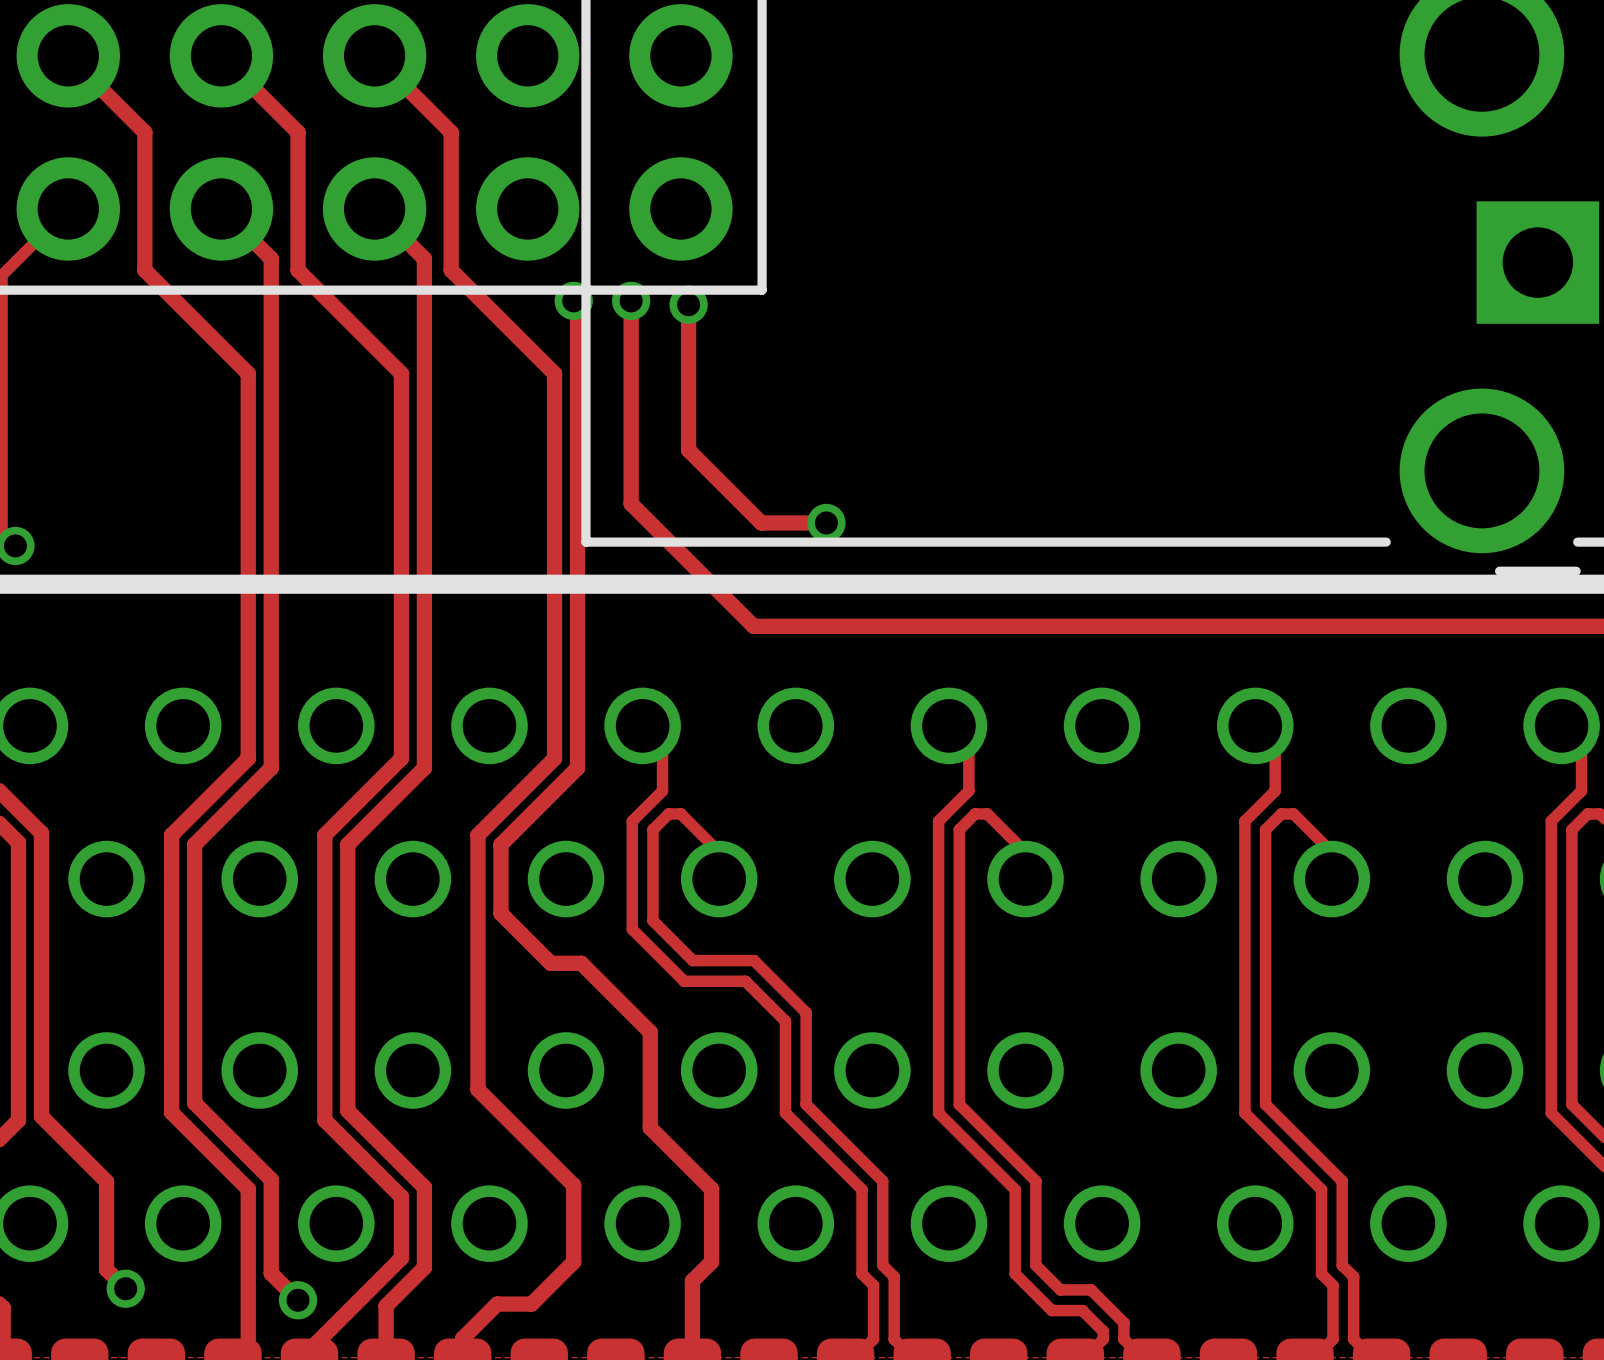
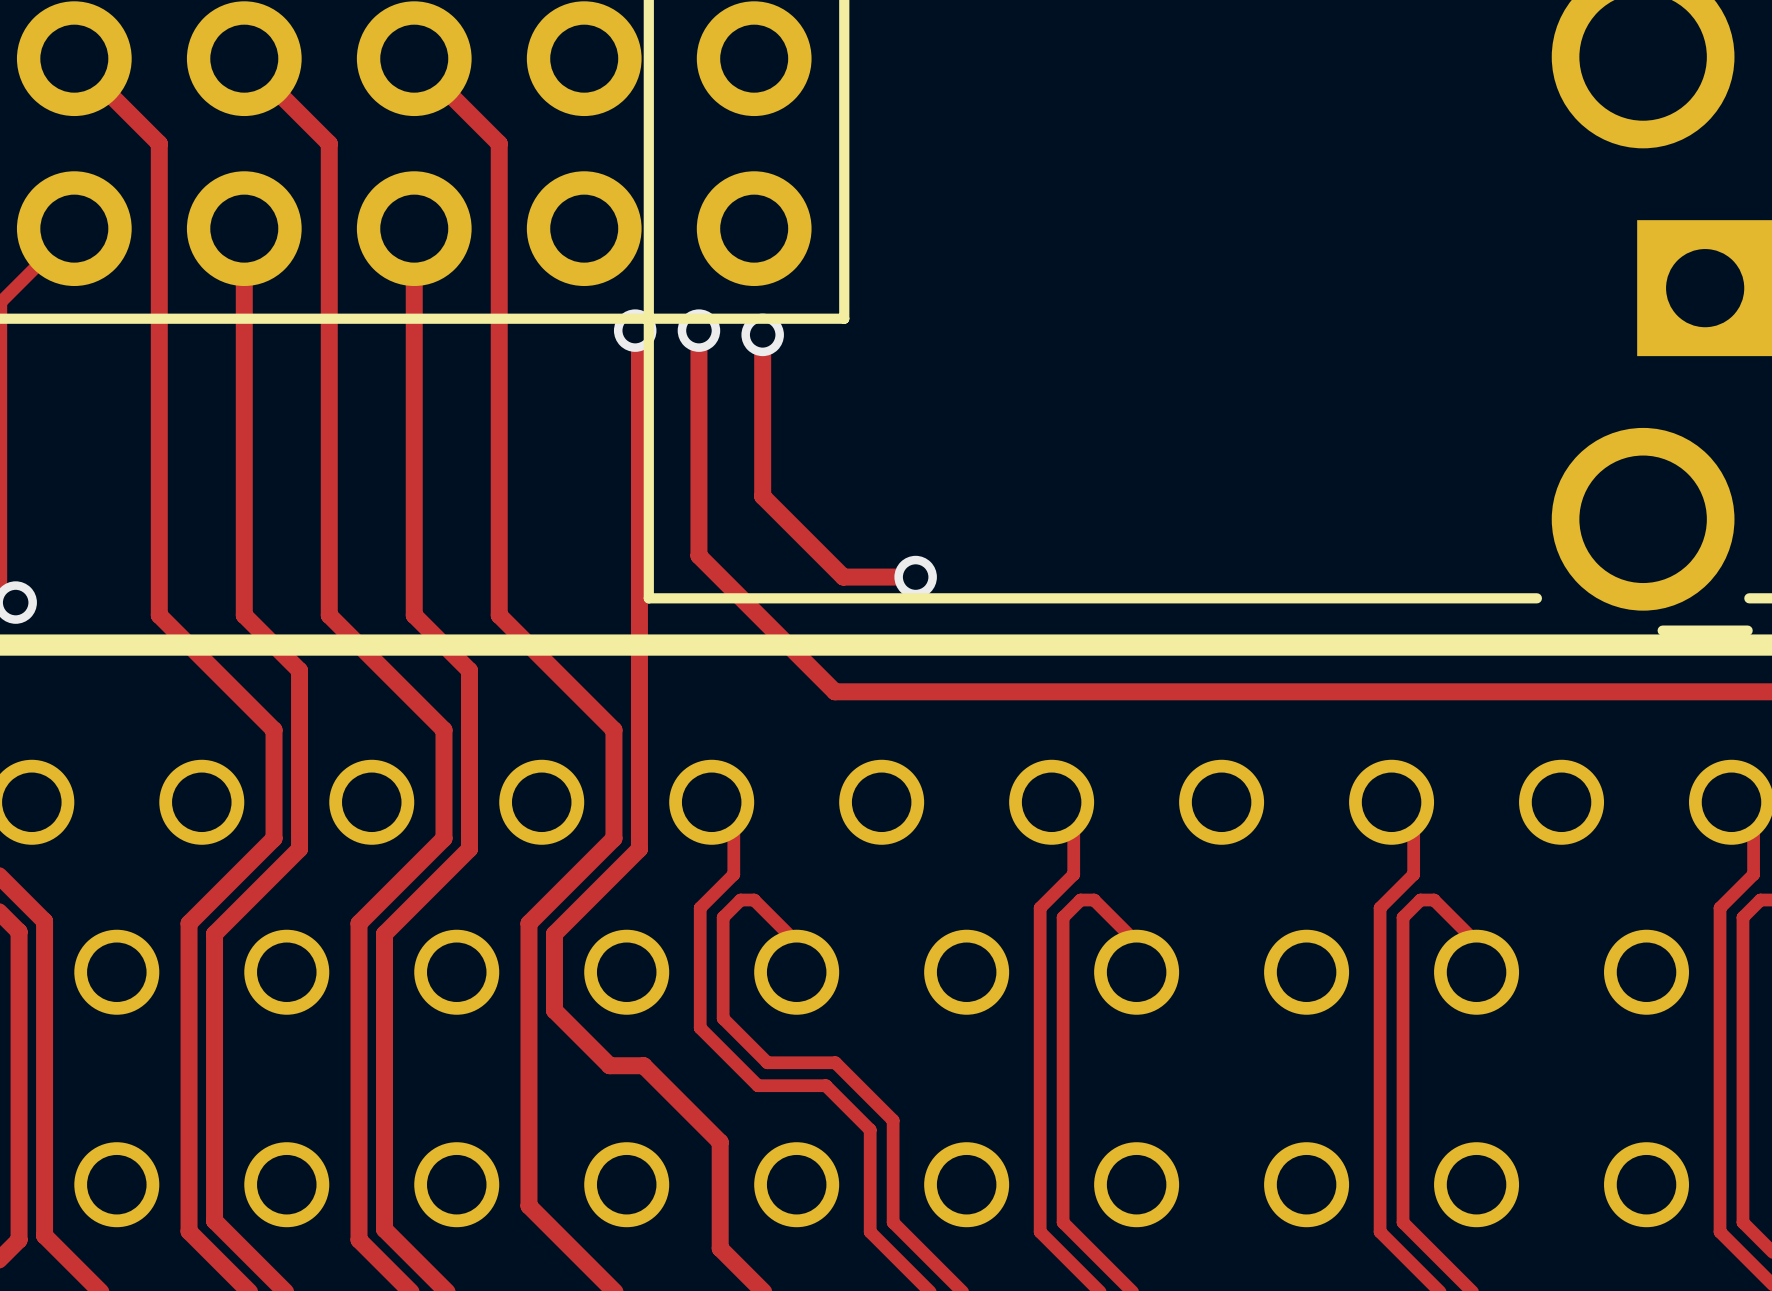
track: (221, 208) (271, 258) (271, 607) -> (244, 228) (244, 615) (299, 670)
track: (374, 208) (424, 258) (424, 607) -> (414, 228) (414, 615) (469, 670)
track: (144, 270) (248, 373) (248, 660) -> (159, 296) (159, 615) (274, 730)
track: (298, 270) (401, 373) (401, 660) -> (329, 296) (329, 615) (443, 730)
track: (451, 270) (554, 373) (554, 660) -> (499, 296) (499, 615) (613, 730)

